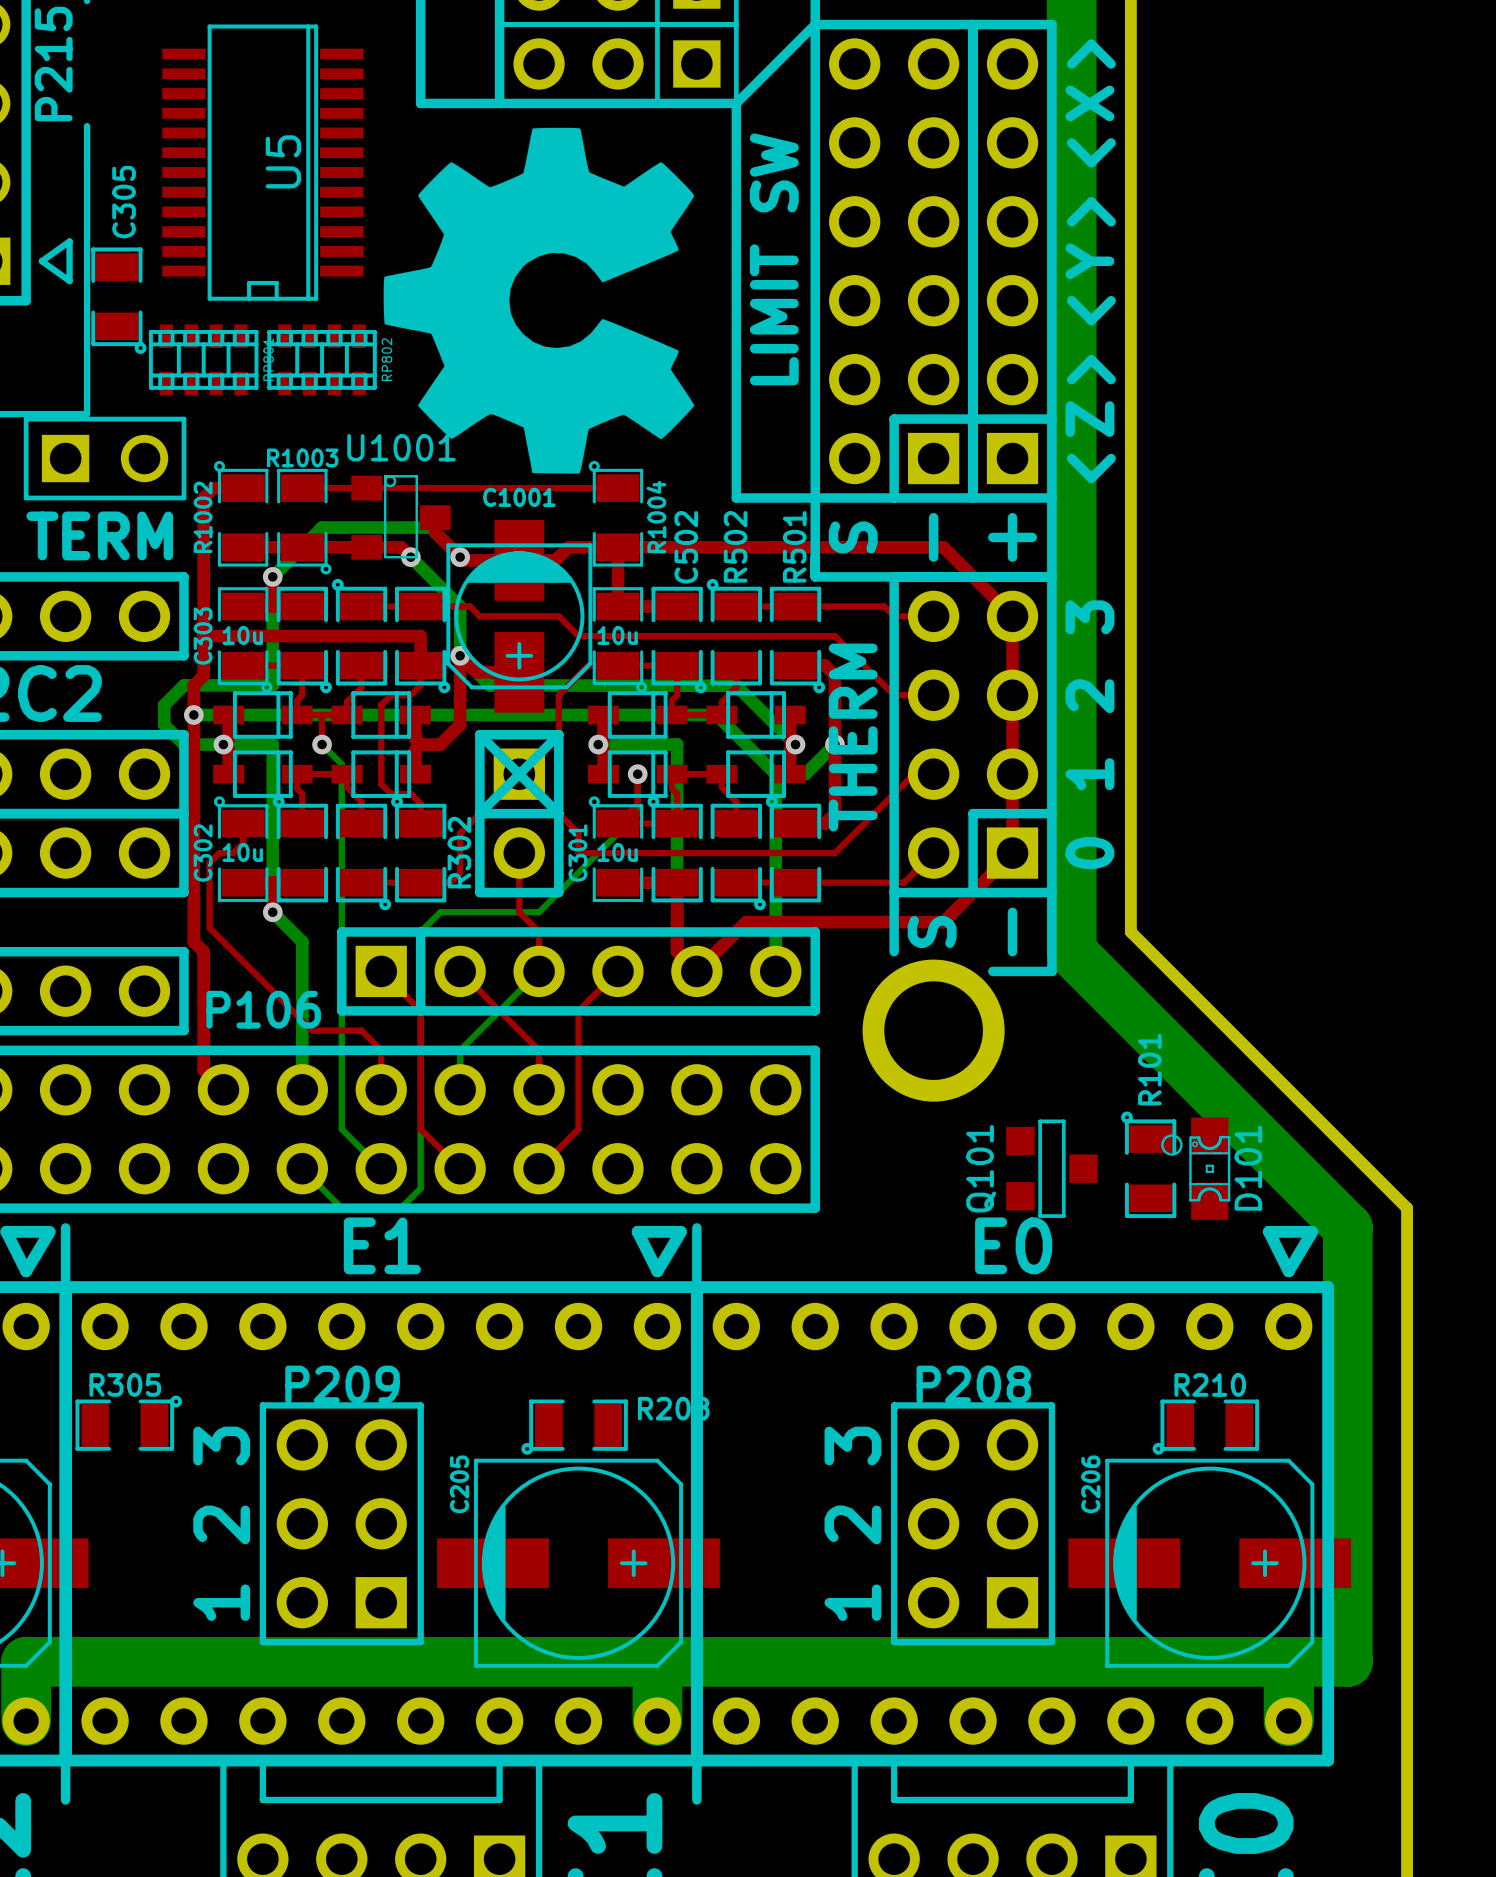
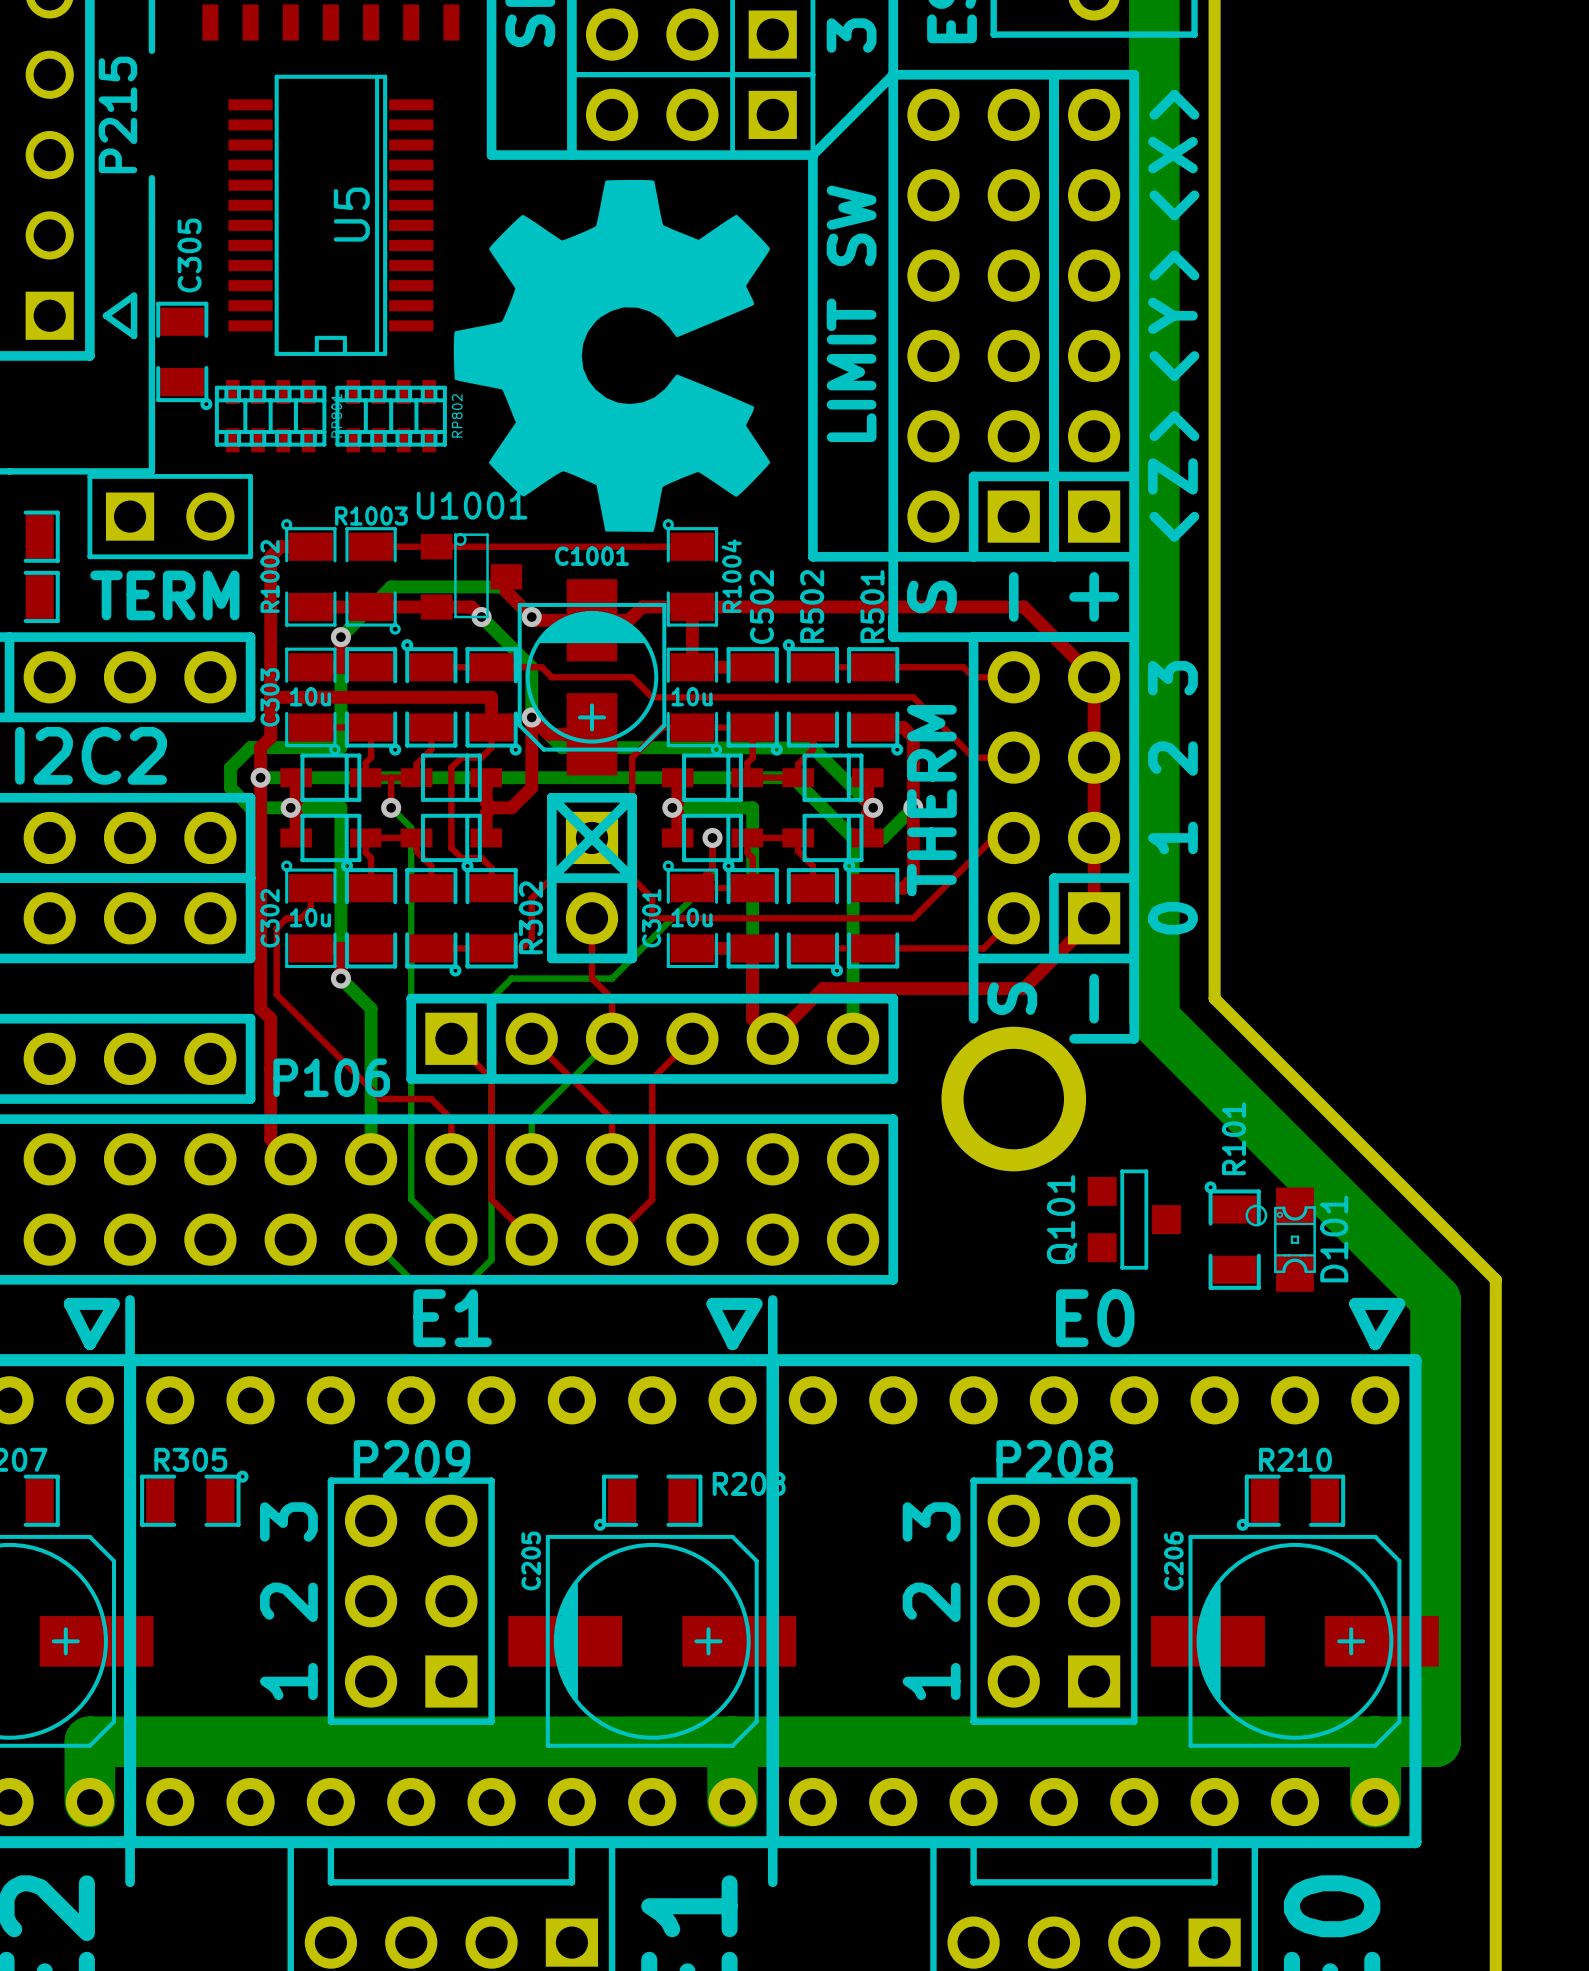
Q101 position: (1051, 1168) -> (1134, 1219)

